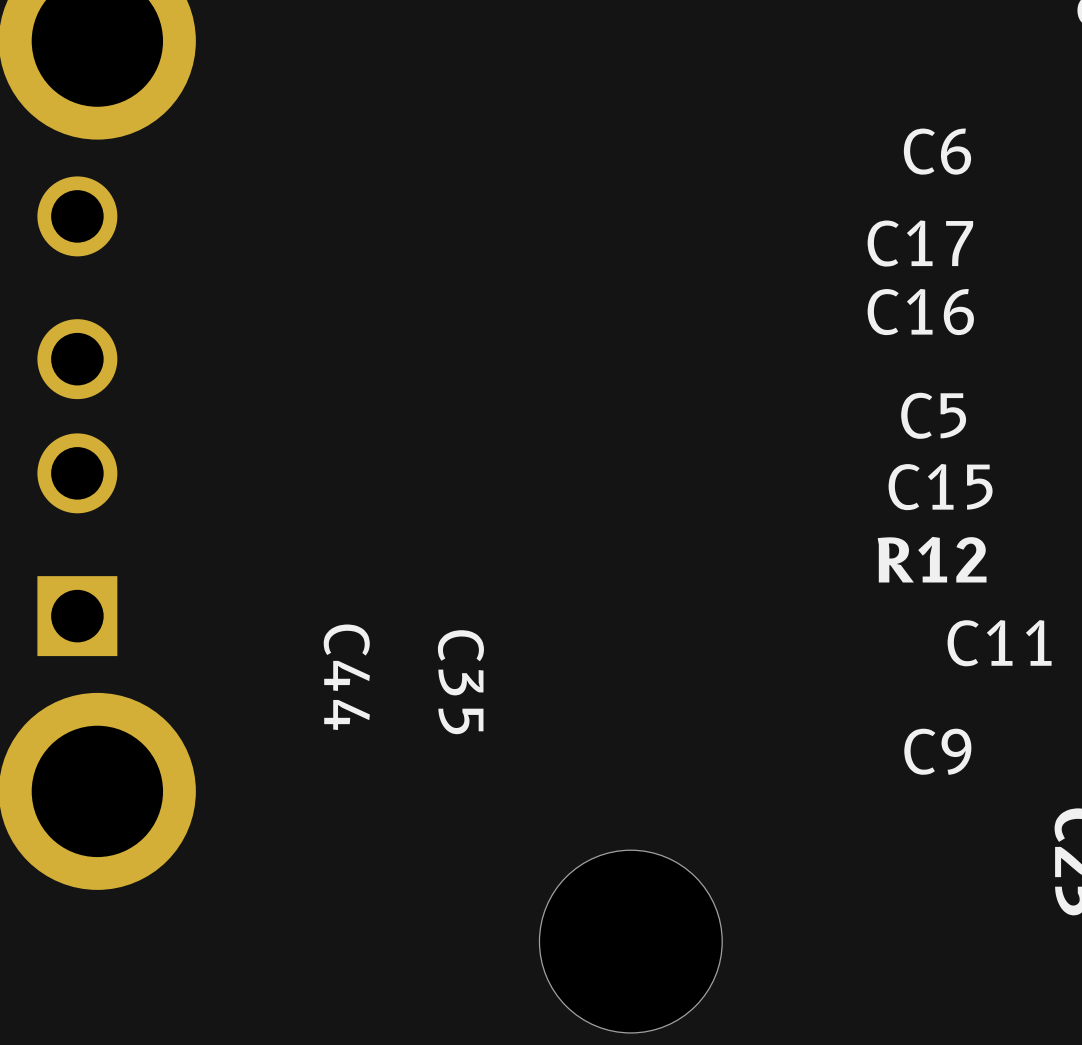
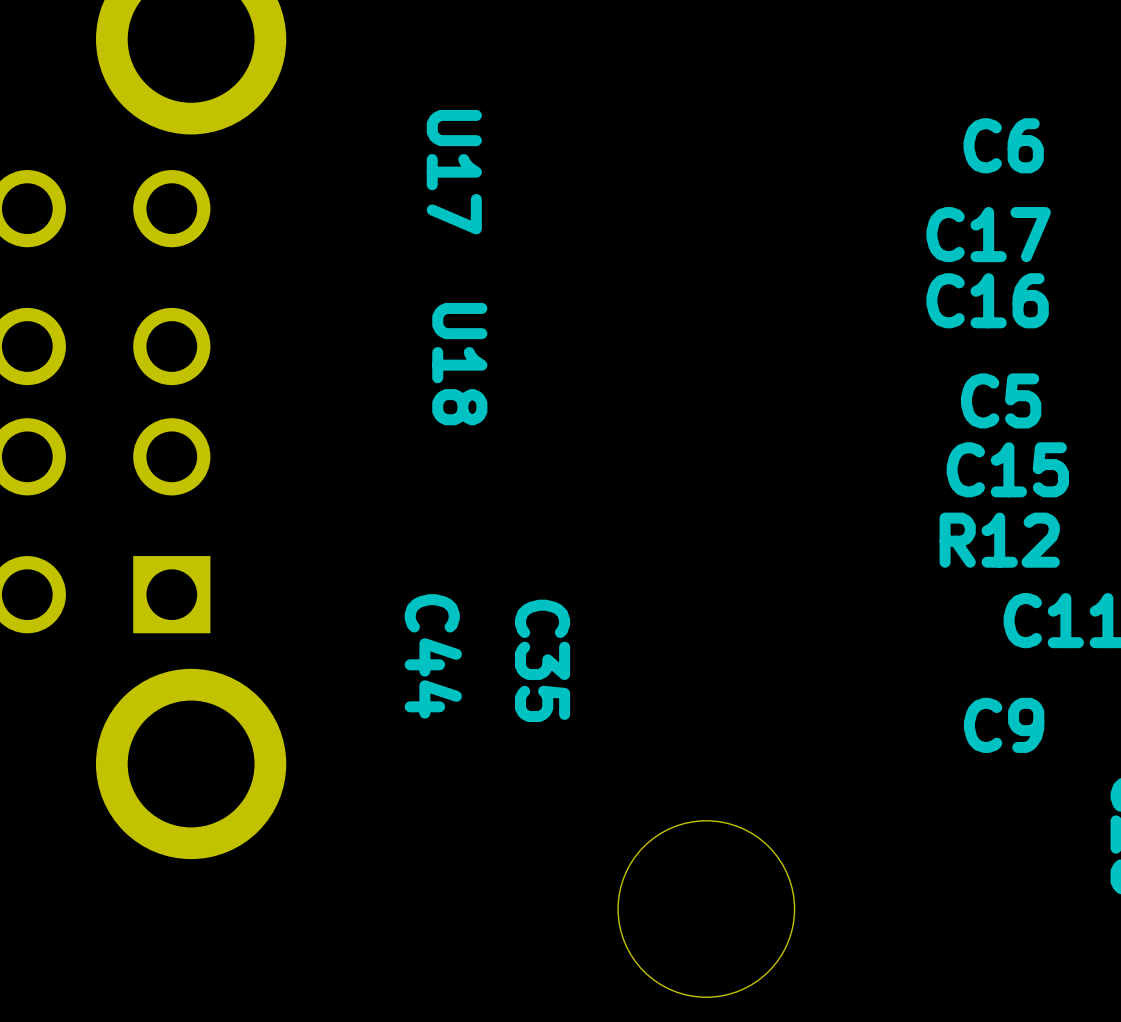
U17: none -> (454, 172)
U18: none -> (459, 364)

